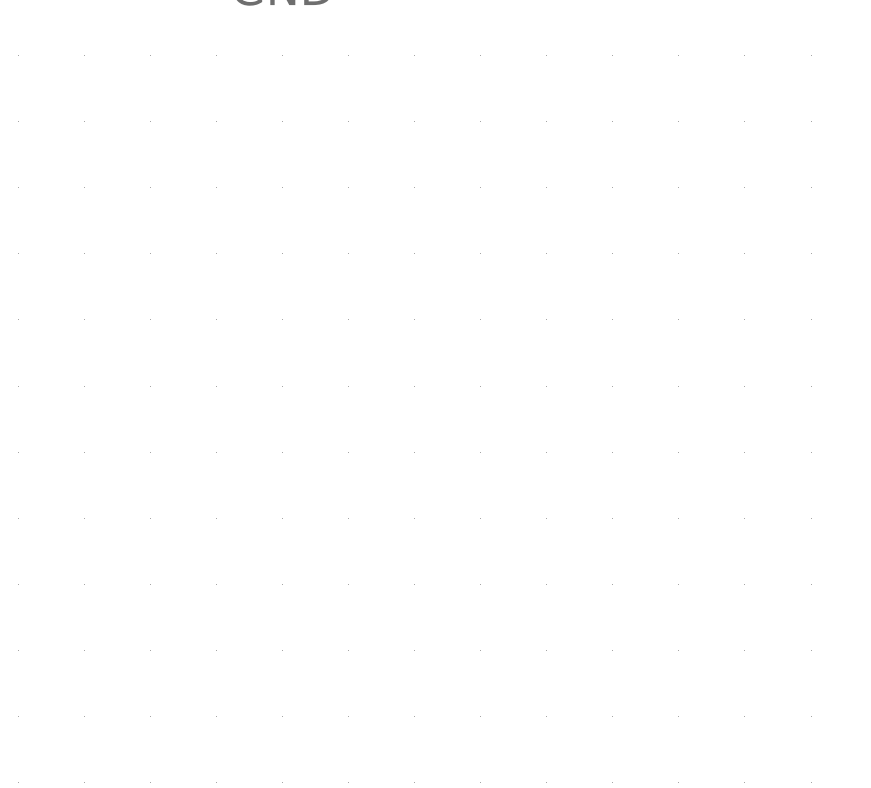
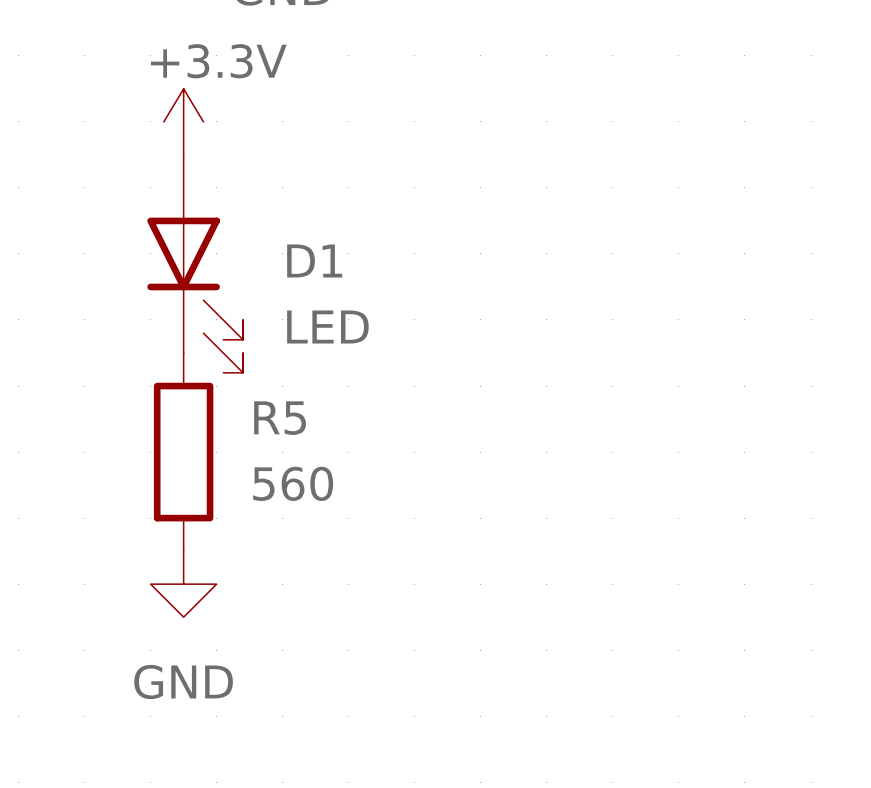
power symbol: none -> +3.3V (183, 121)
D1: none -> LED (195, 263)
R5: none -> 560 (183, 452)
power symbol: none -> GND (183, 584)

